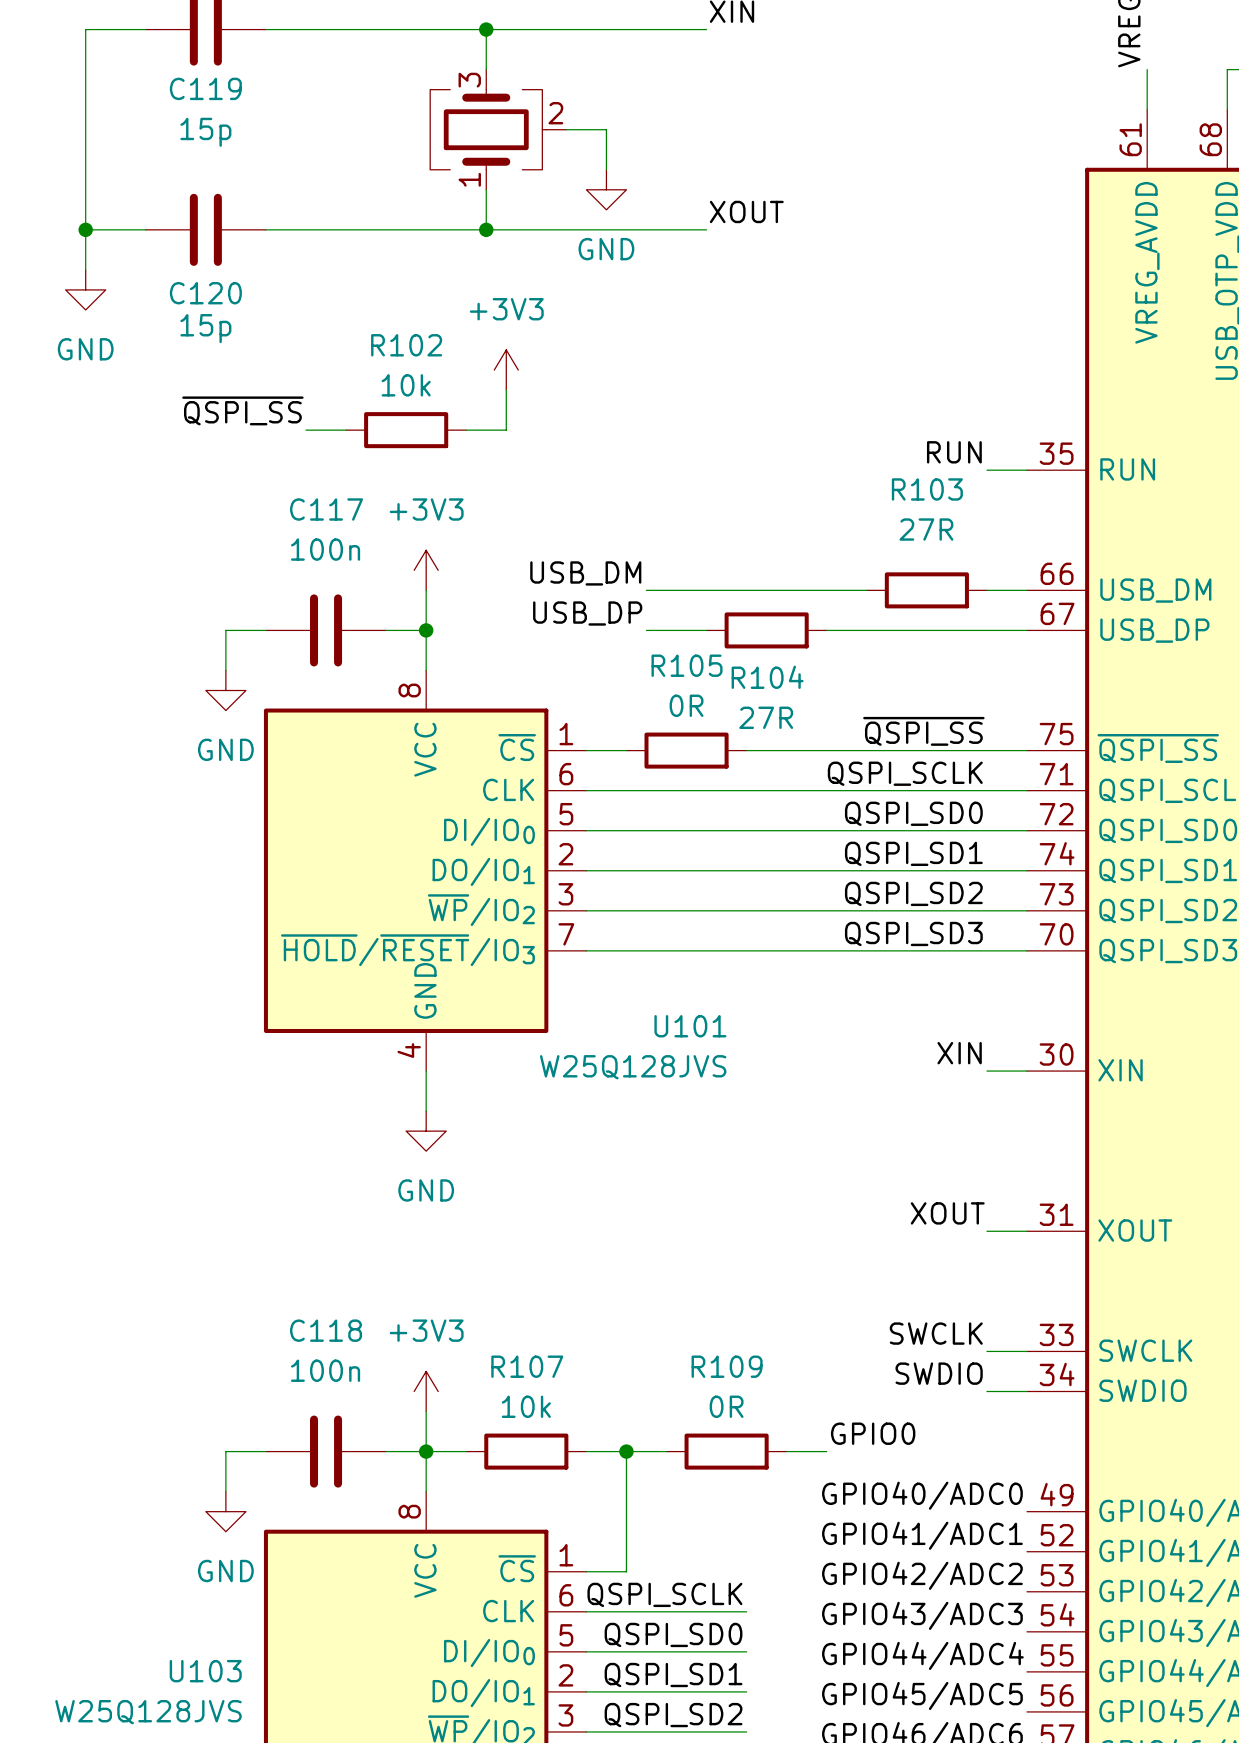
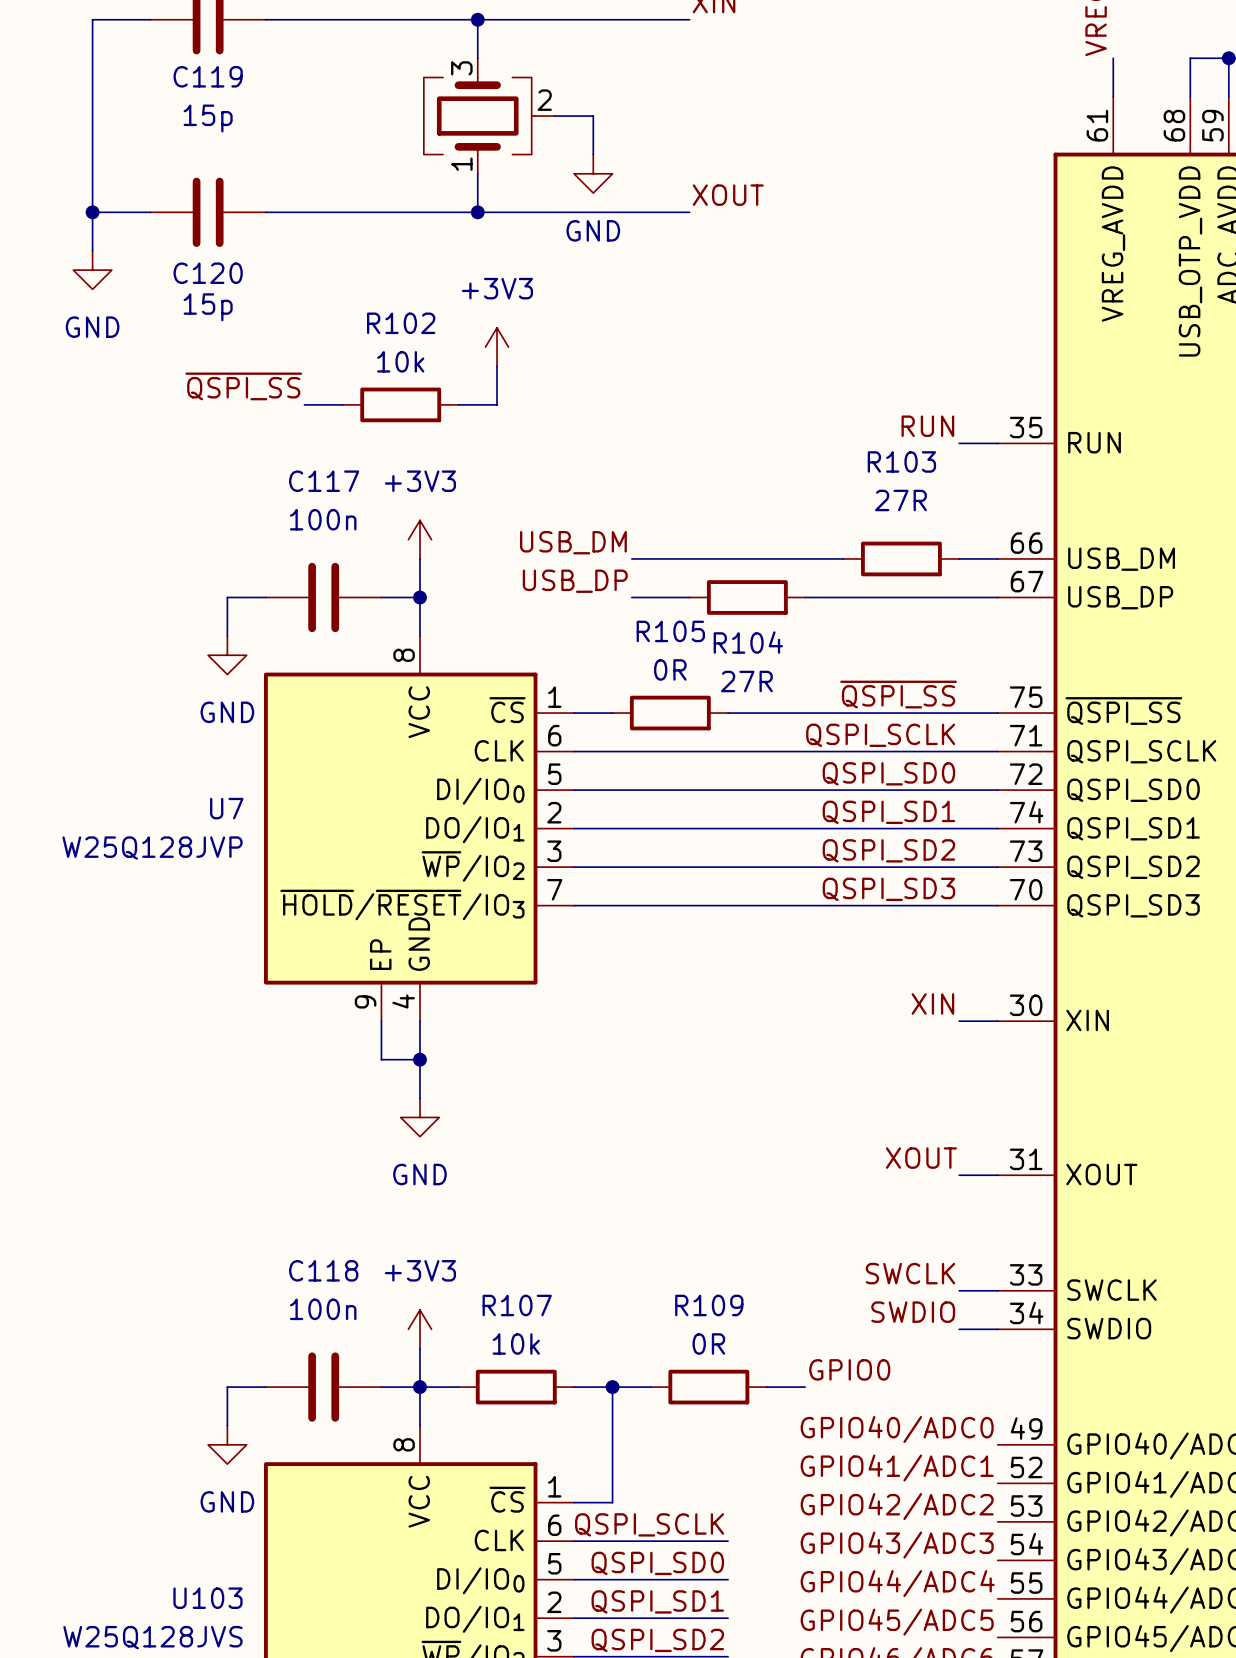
U101: W25Q128JVS (425, 870) -> none
U7: none -> W25Q128JVP (419, 828)
wire: none -> (381, 1021) (381, 1059) (419, 1059) (419, 1098)
junction: none -> (419, 1059)
power symbol position: GND (426, 1131) -> GND (419, 1117)

